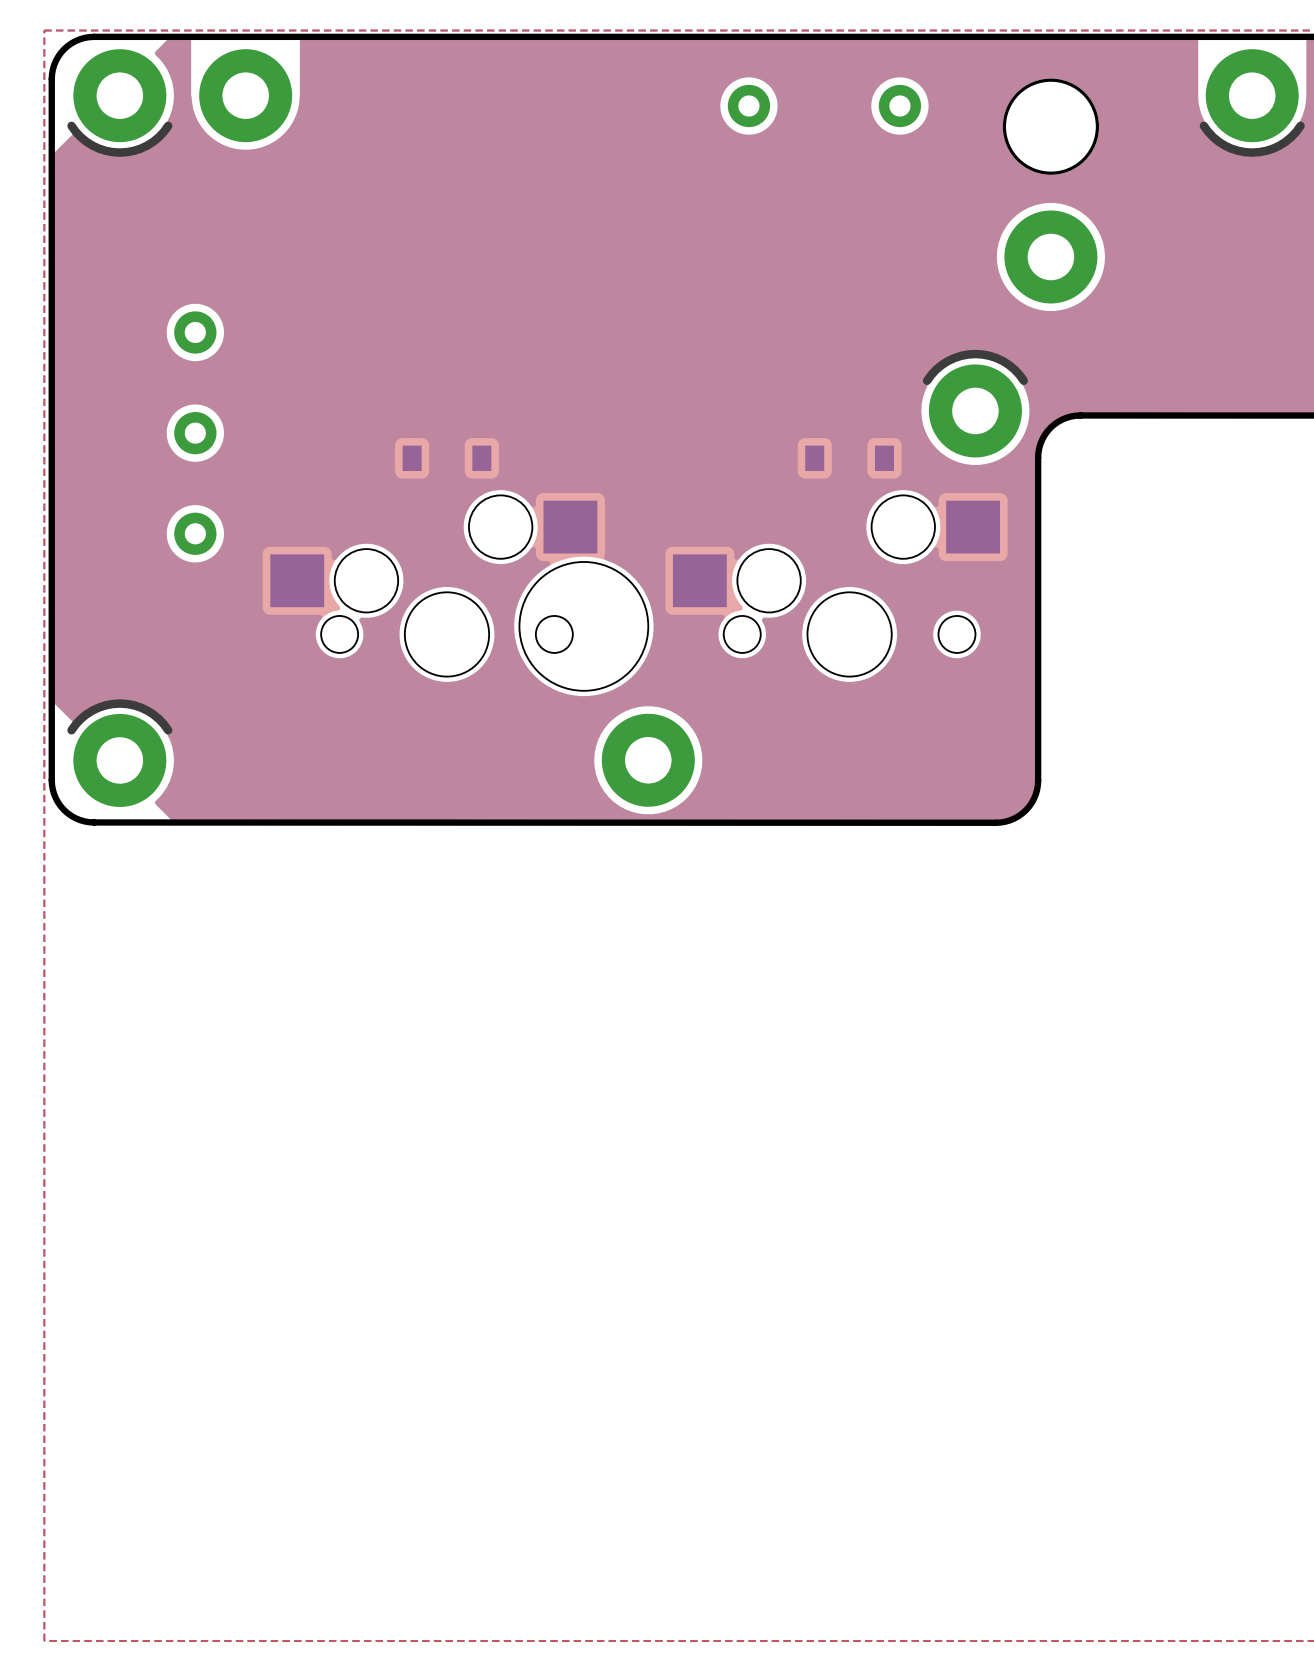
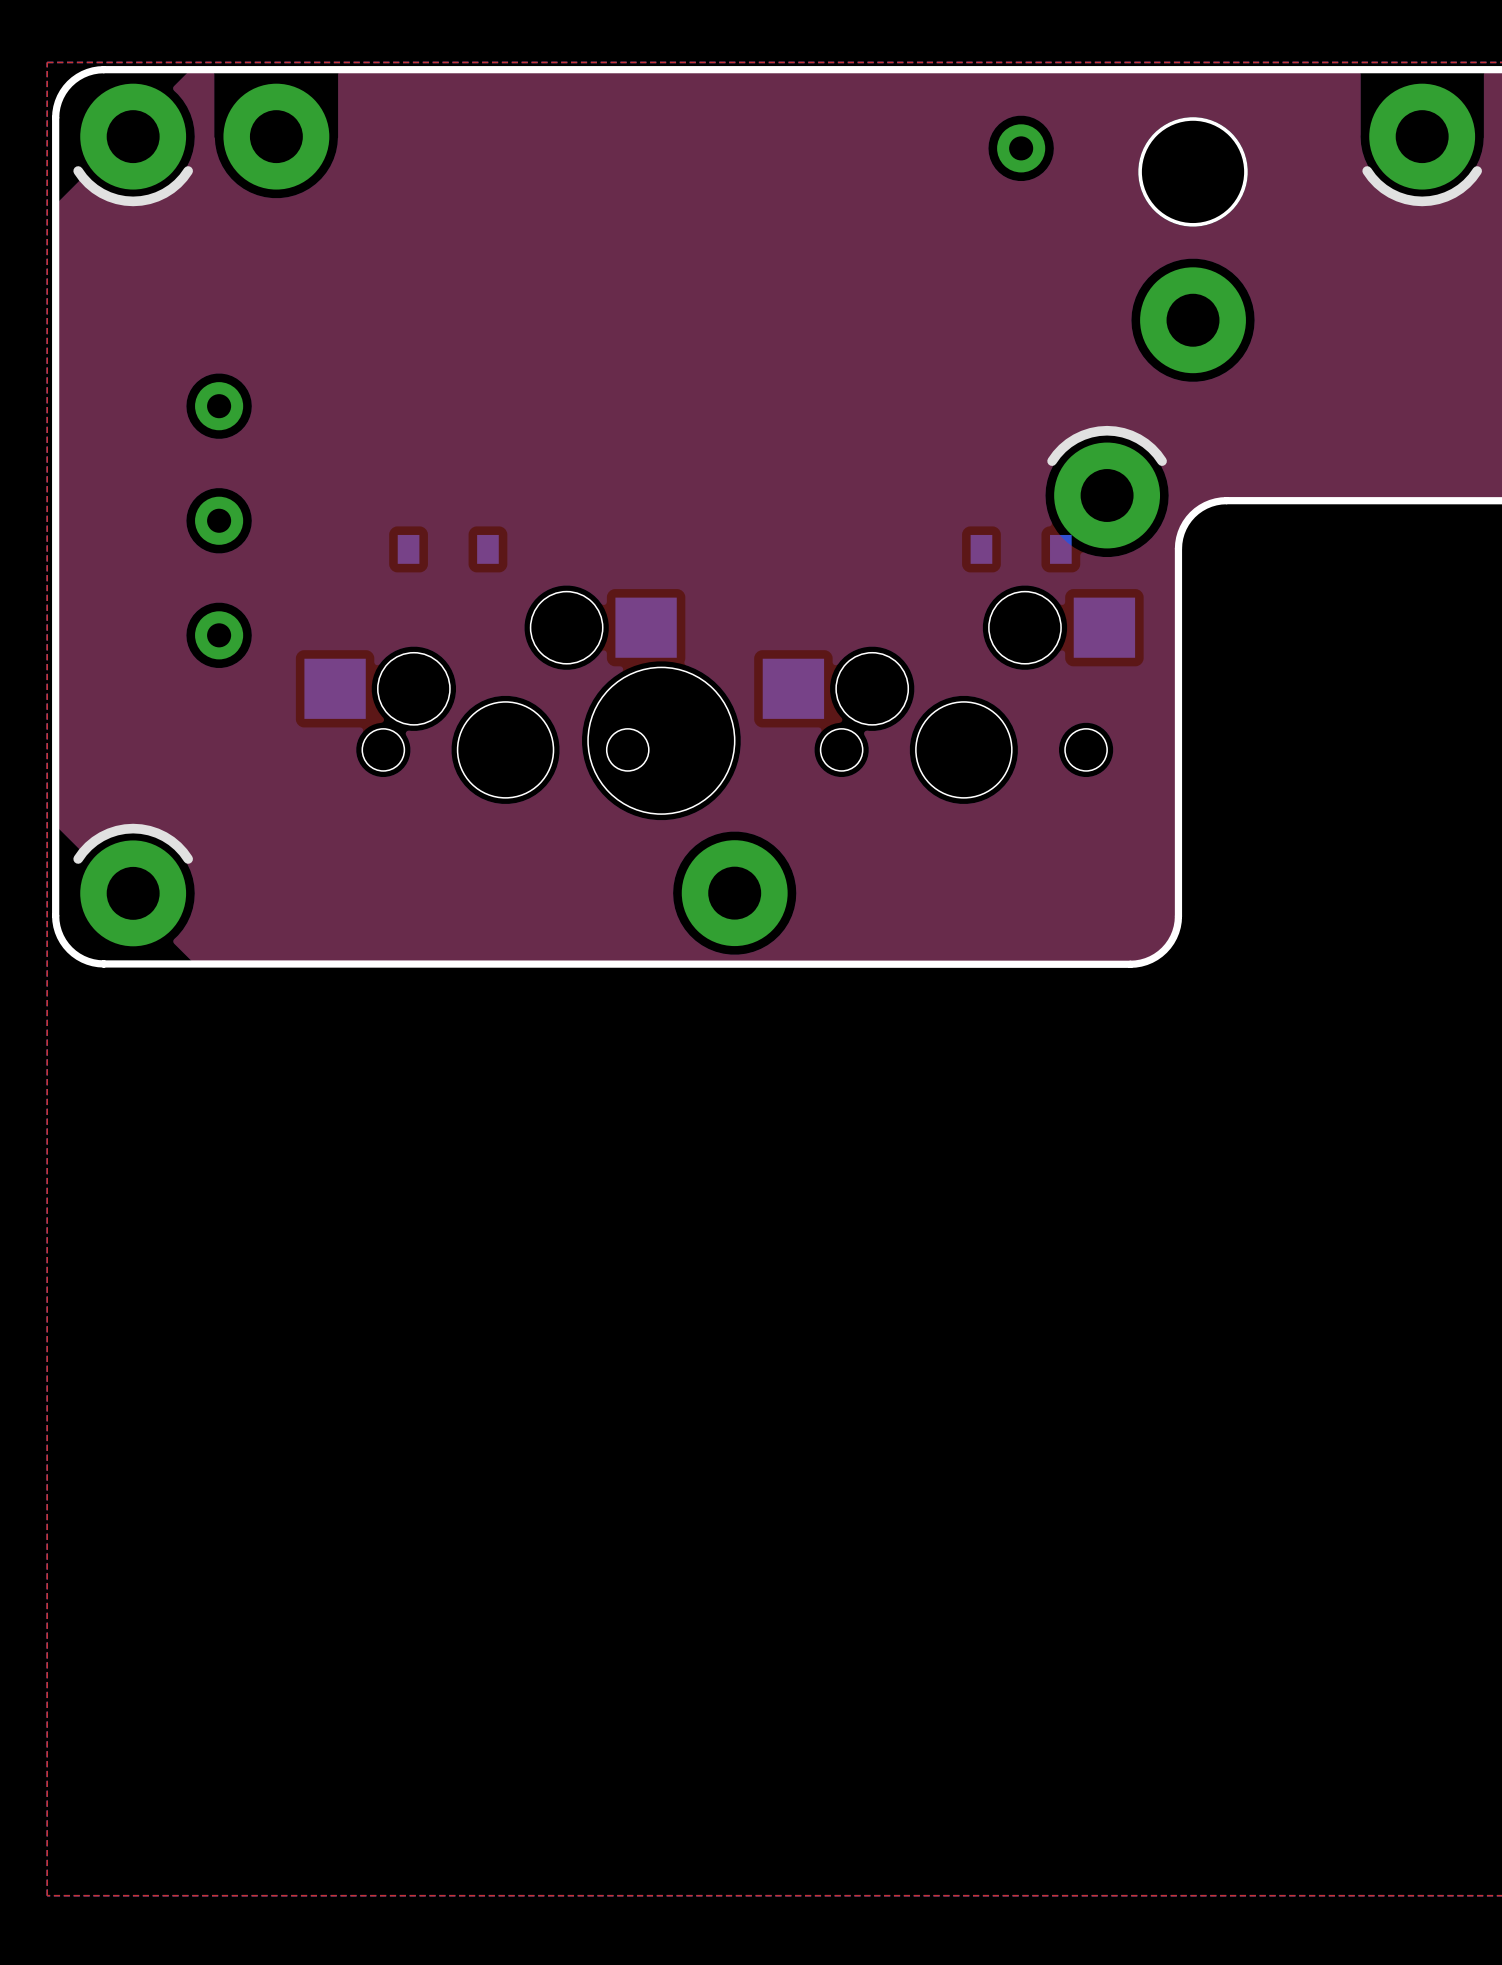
part: (748, 106) -> none
part position: (446, 458) -> (448, 549)
part position: (849, 458) -> (1021, 549)

